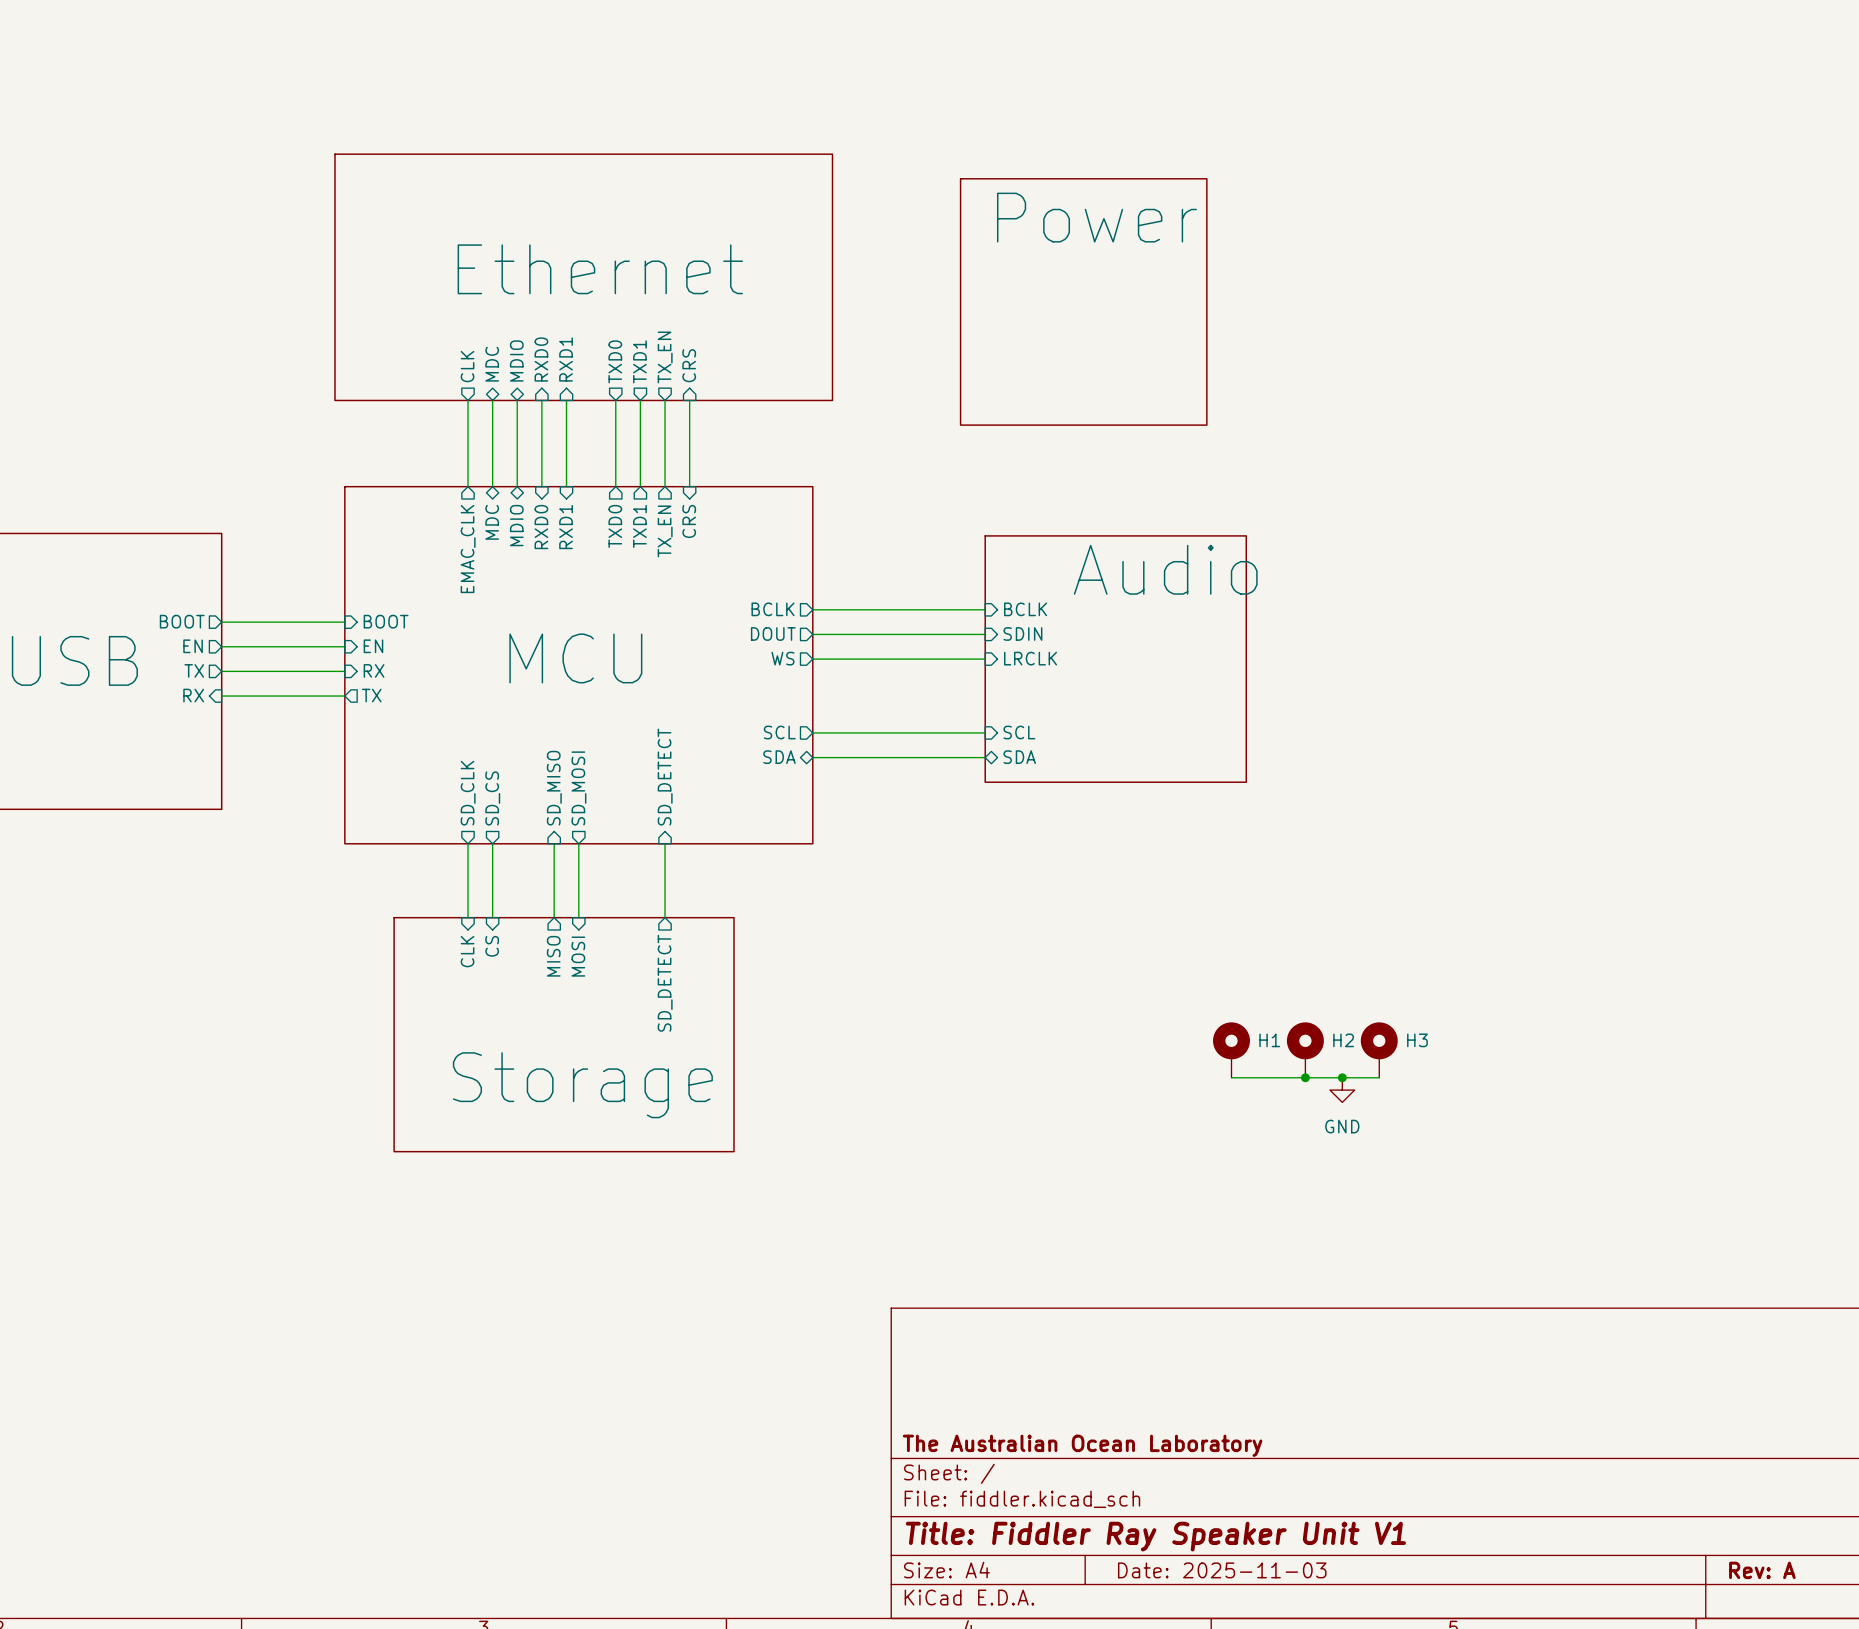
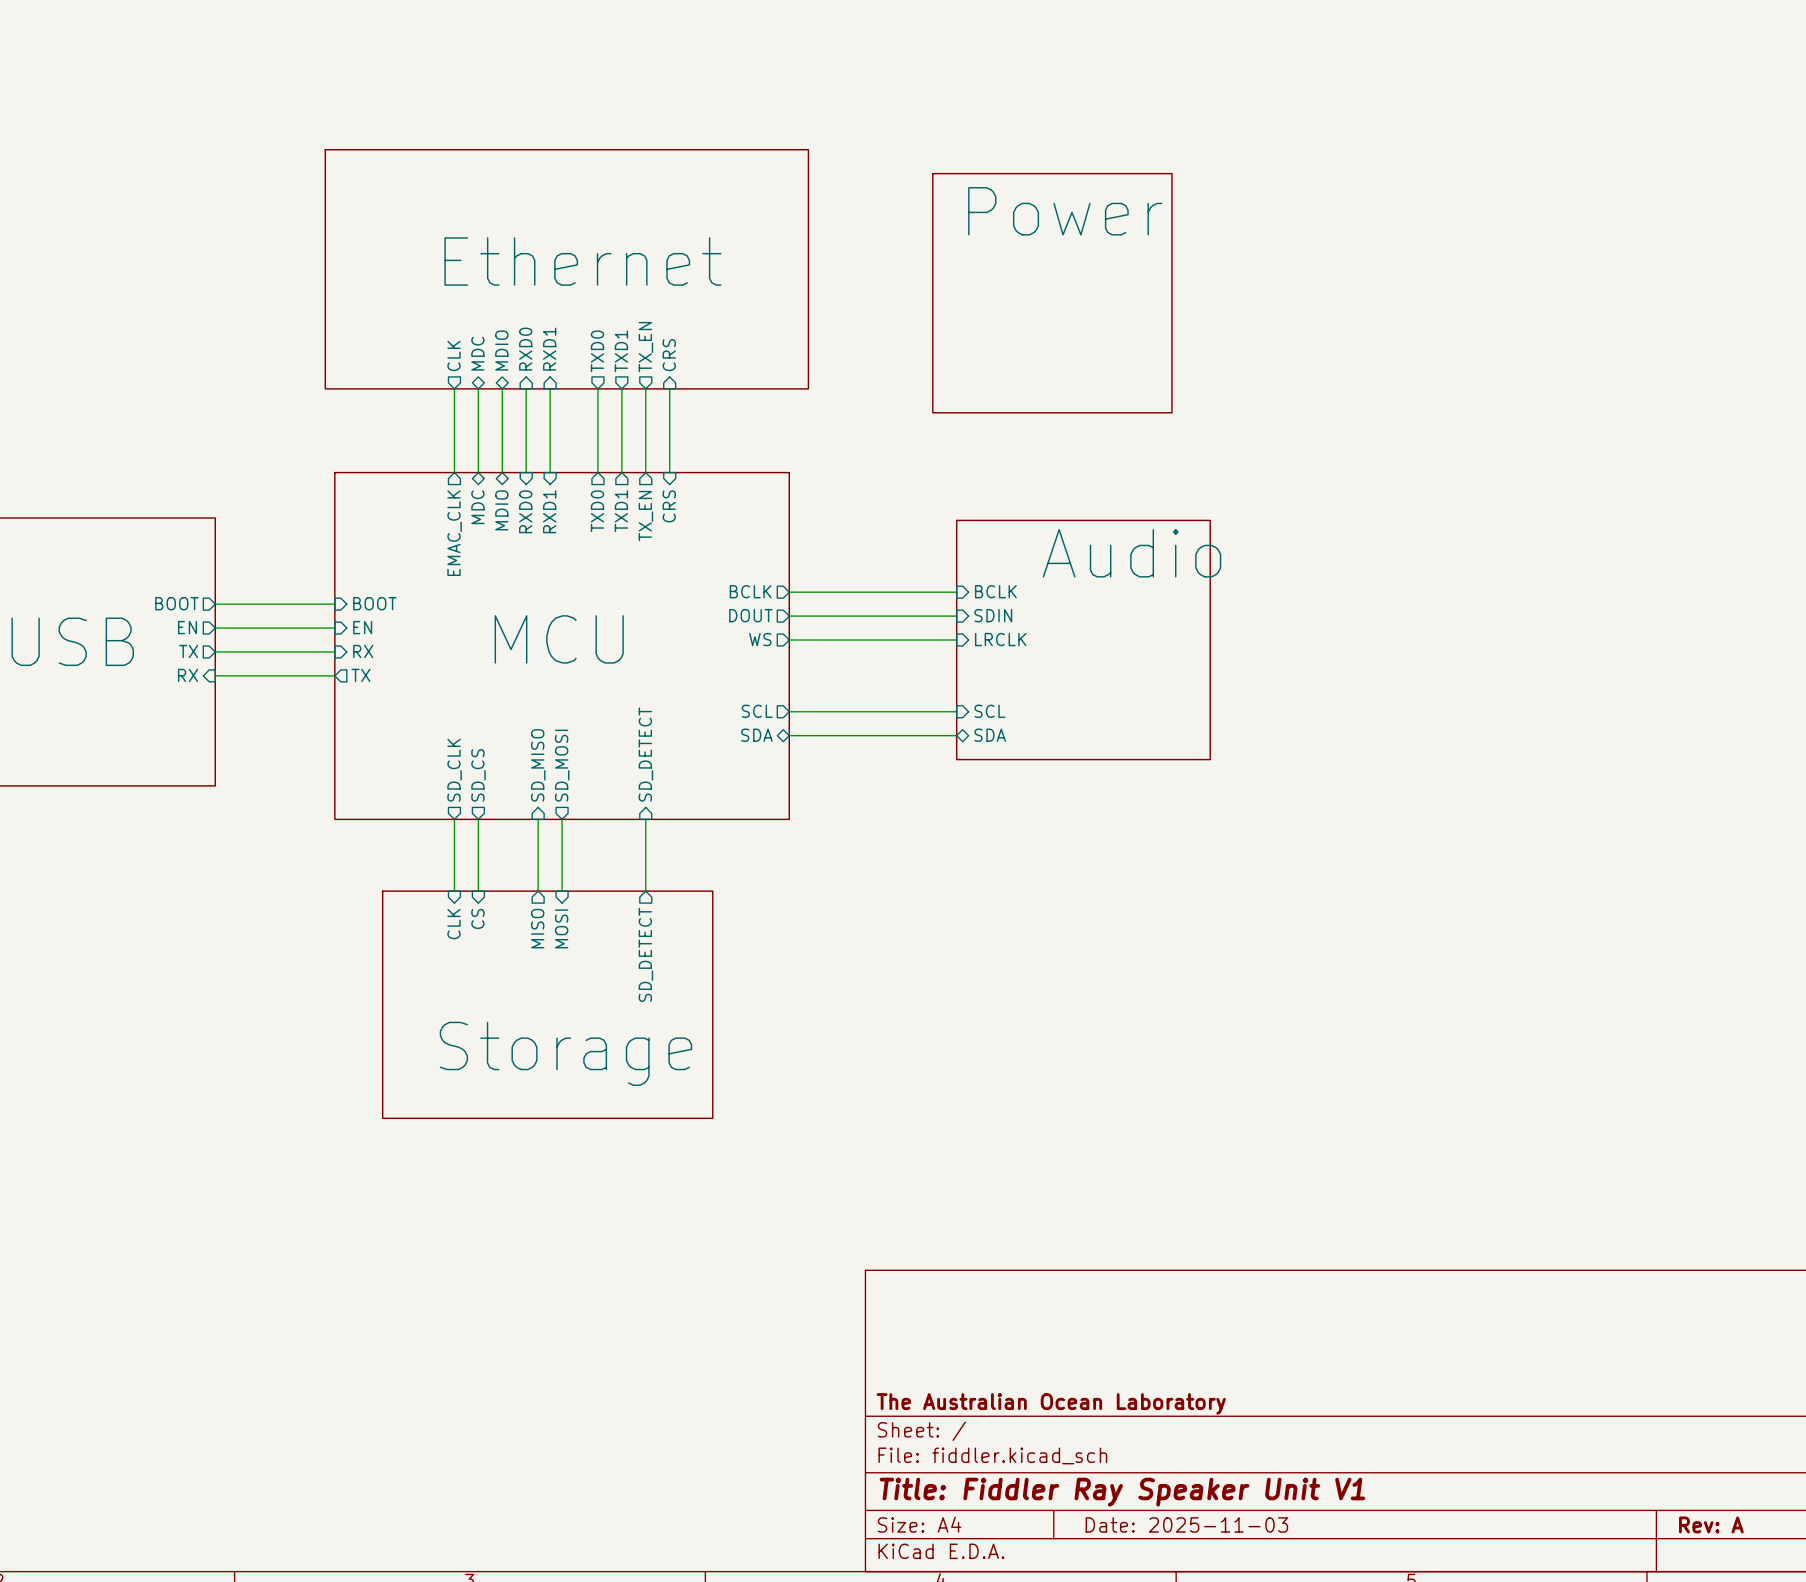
H1: (1231, 1050) -> none
H2: (1305, 1050) -> none
H3: (1379, 1050) -> none
wire: (1231, 1077) (1379, 1077) -> none
junction: (1305, 1077) -> none
junction: (1342, 1077) -> none
power symbol: GND (1342, 1090) -> none

